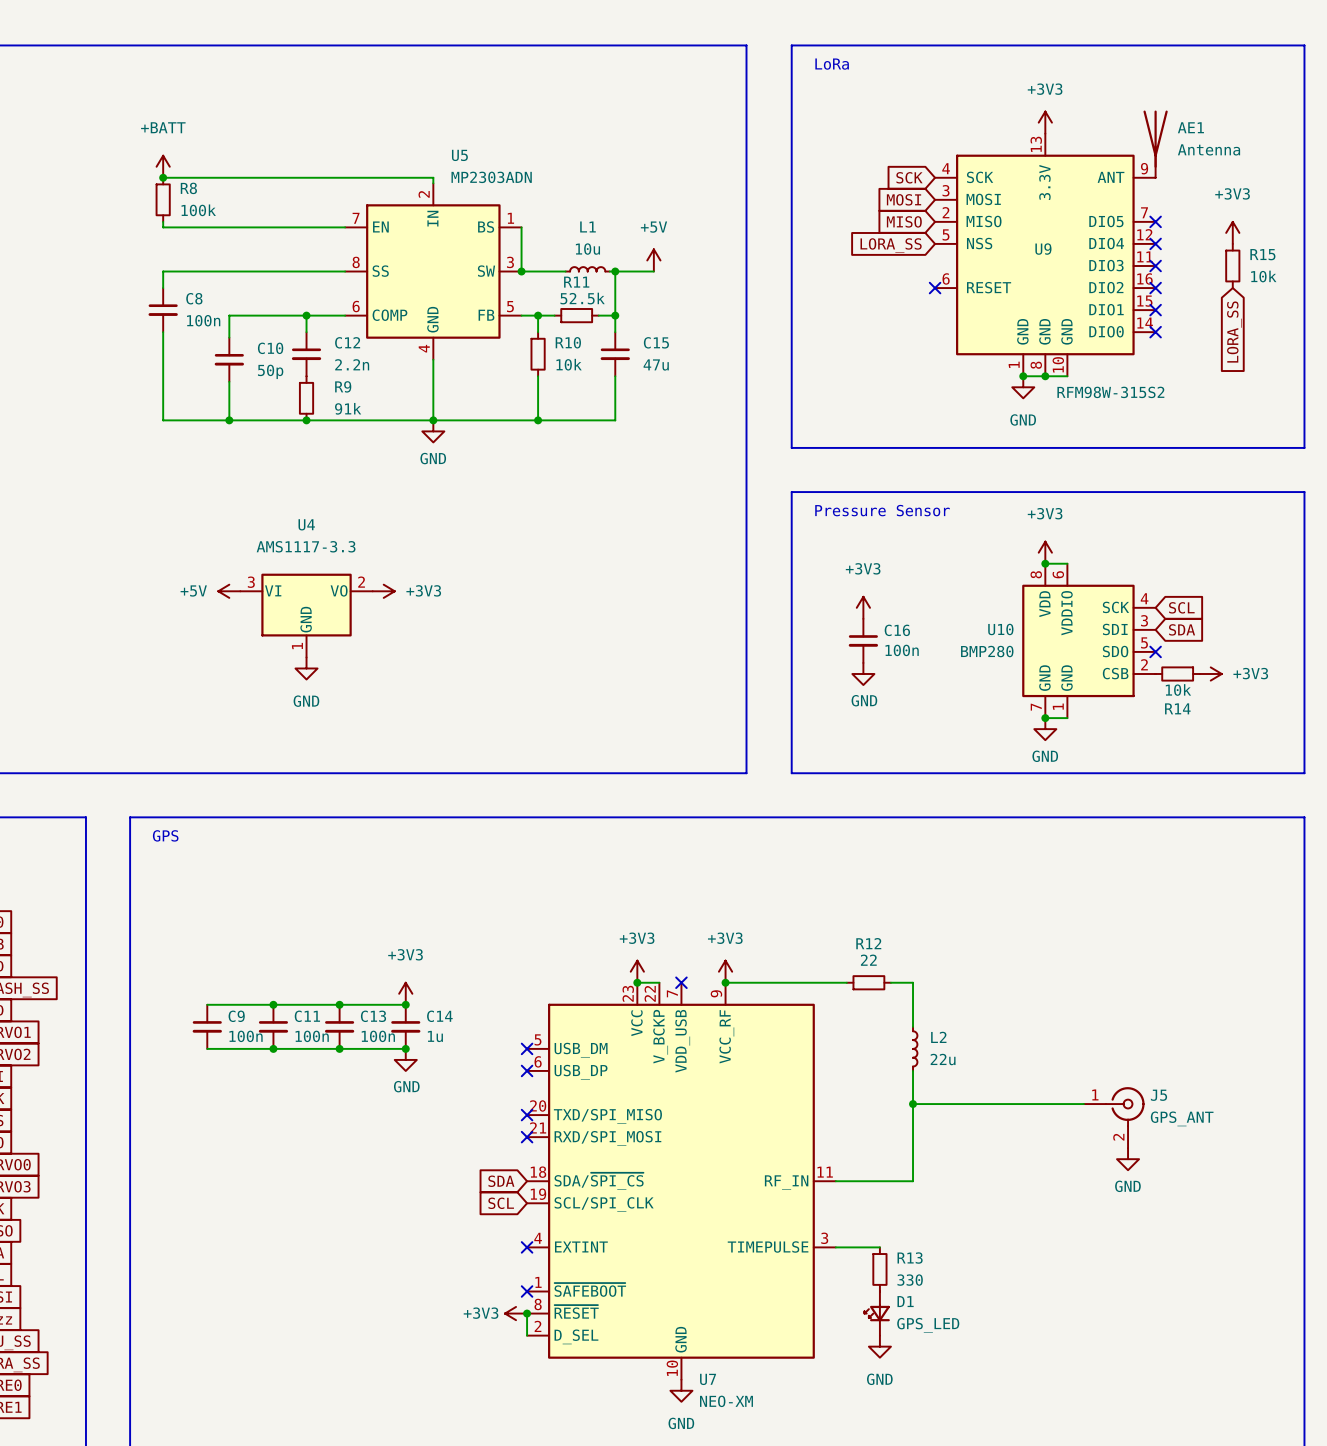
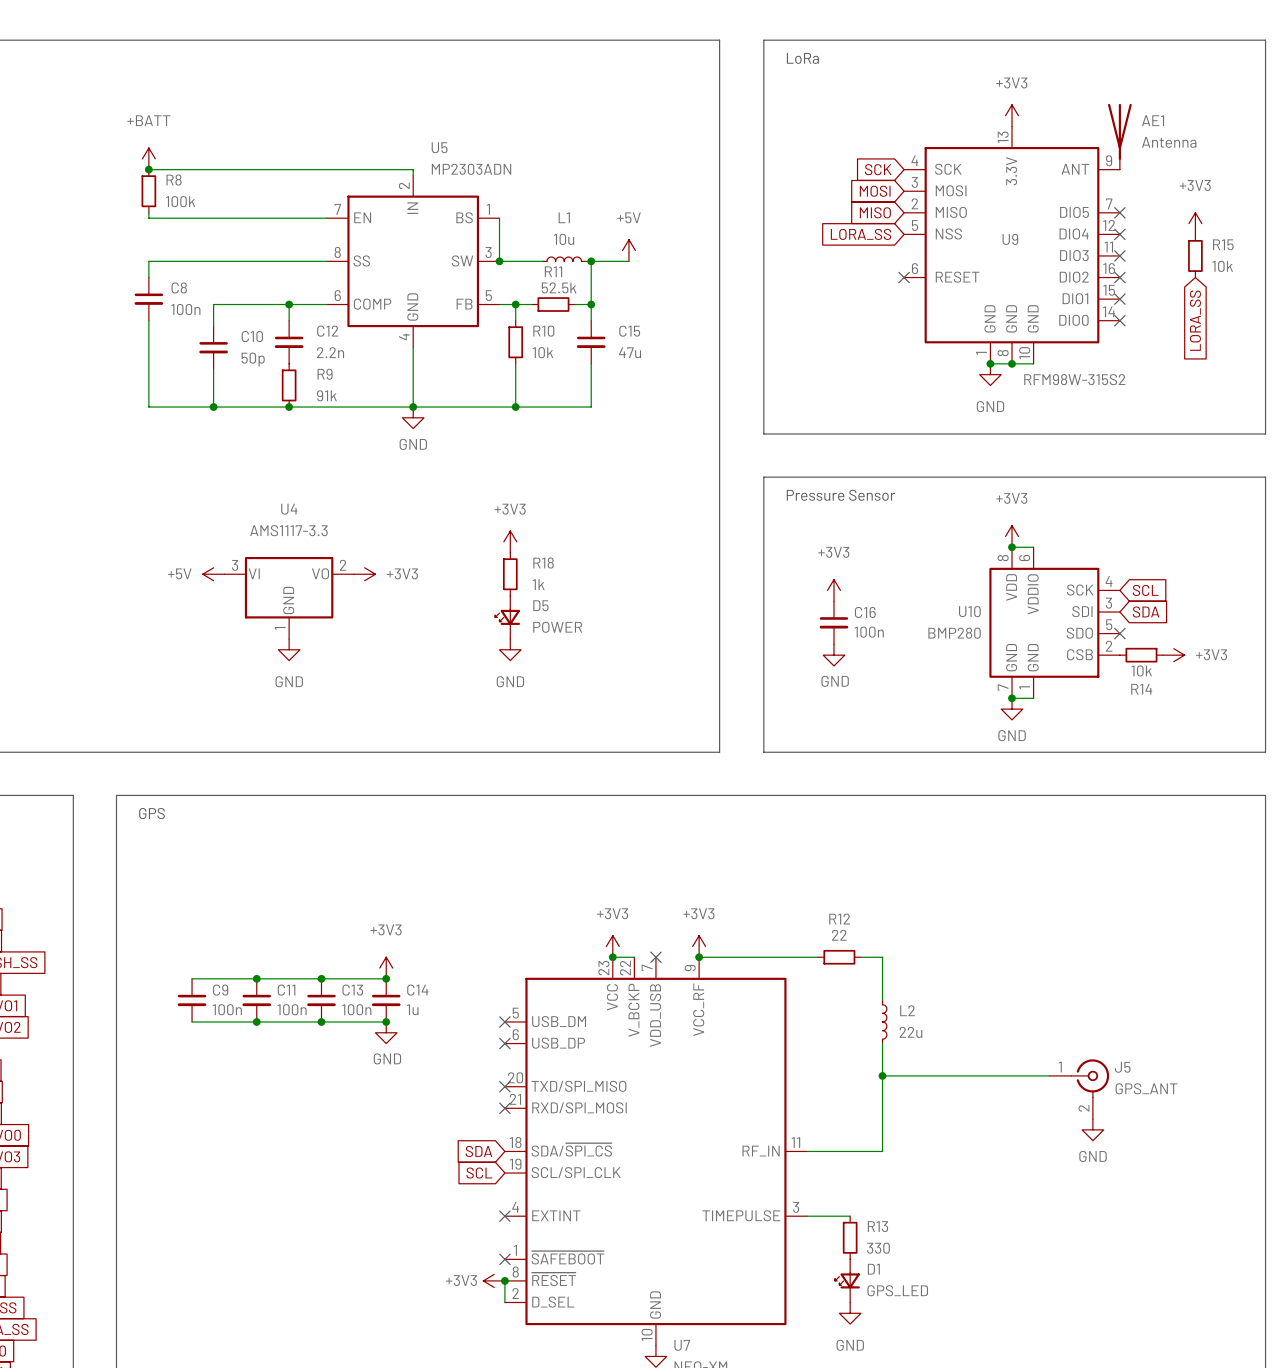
power symbol: none -> +3V3 (510, 541)
R18: none -> 1k (510, 574)
D5: none -> POWER (507, 617)
power symbol: none -> GND (510, 649)

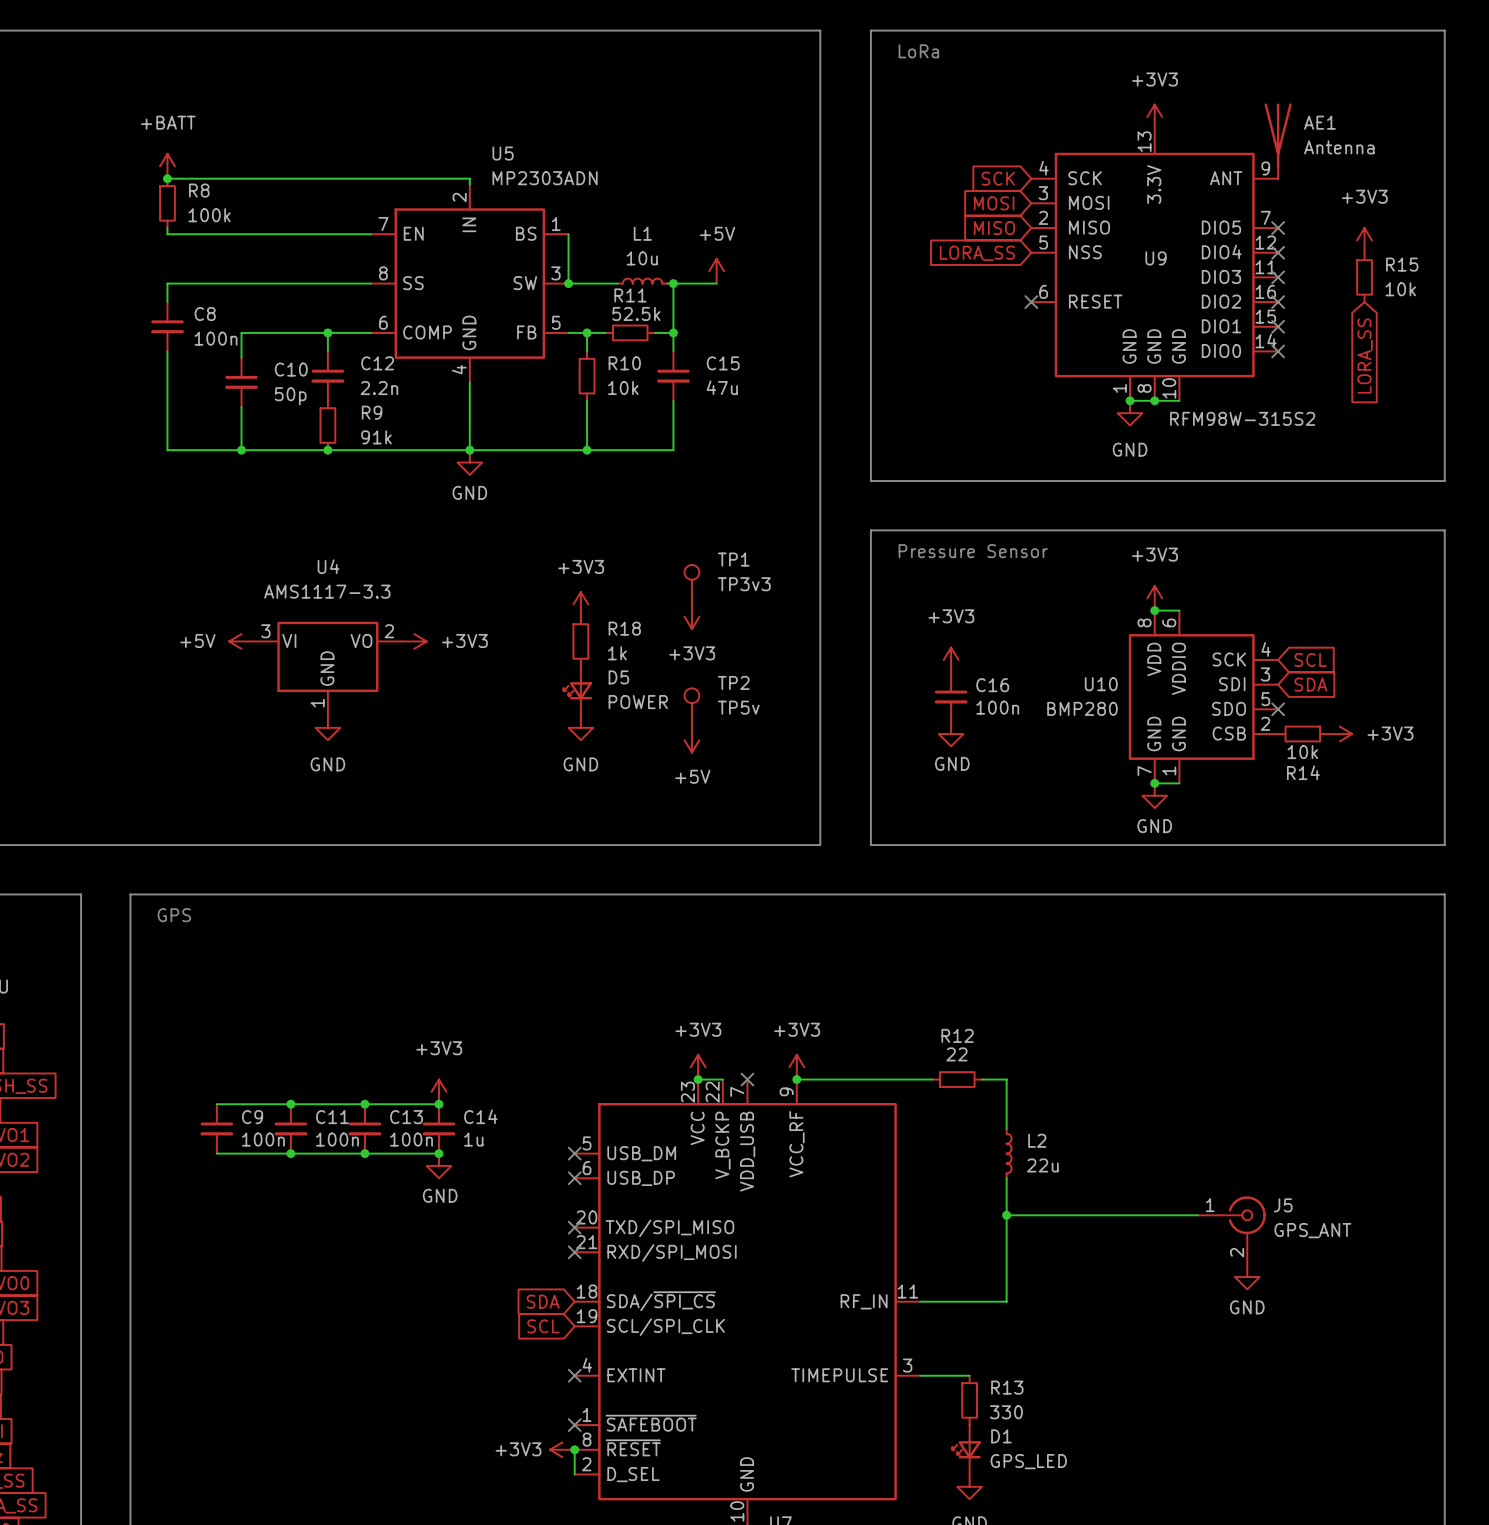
TP1: none -> TP3v3 (691, 584)
power symbol: none -> +3V3 (691, 616)
TP2: none -> TP5v (691, 708)
power symbol: none -> +5V (691, 740)

